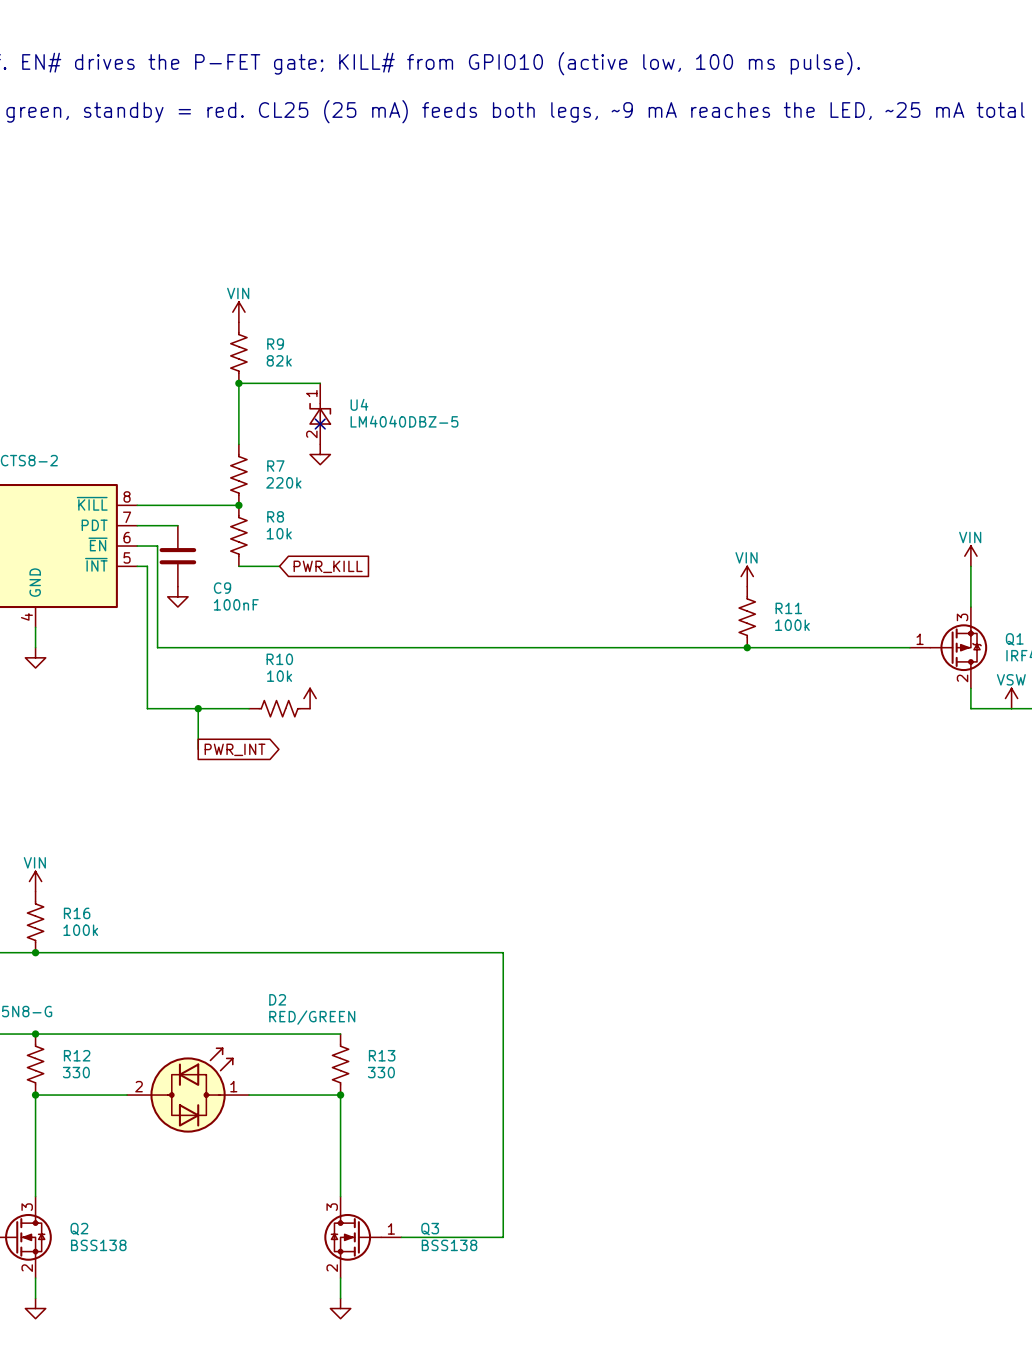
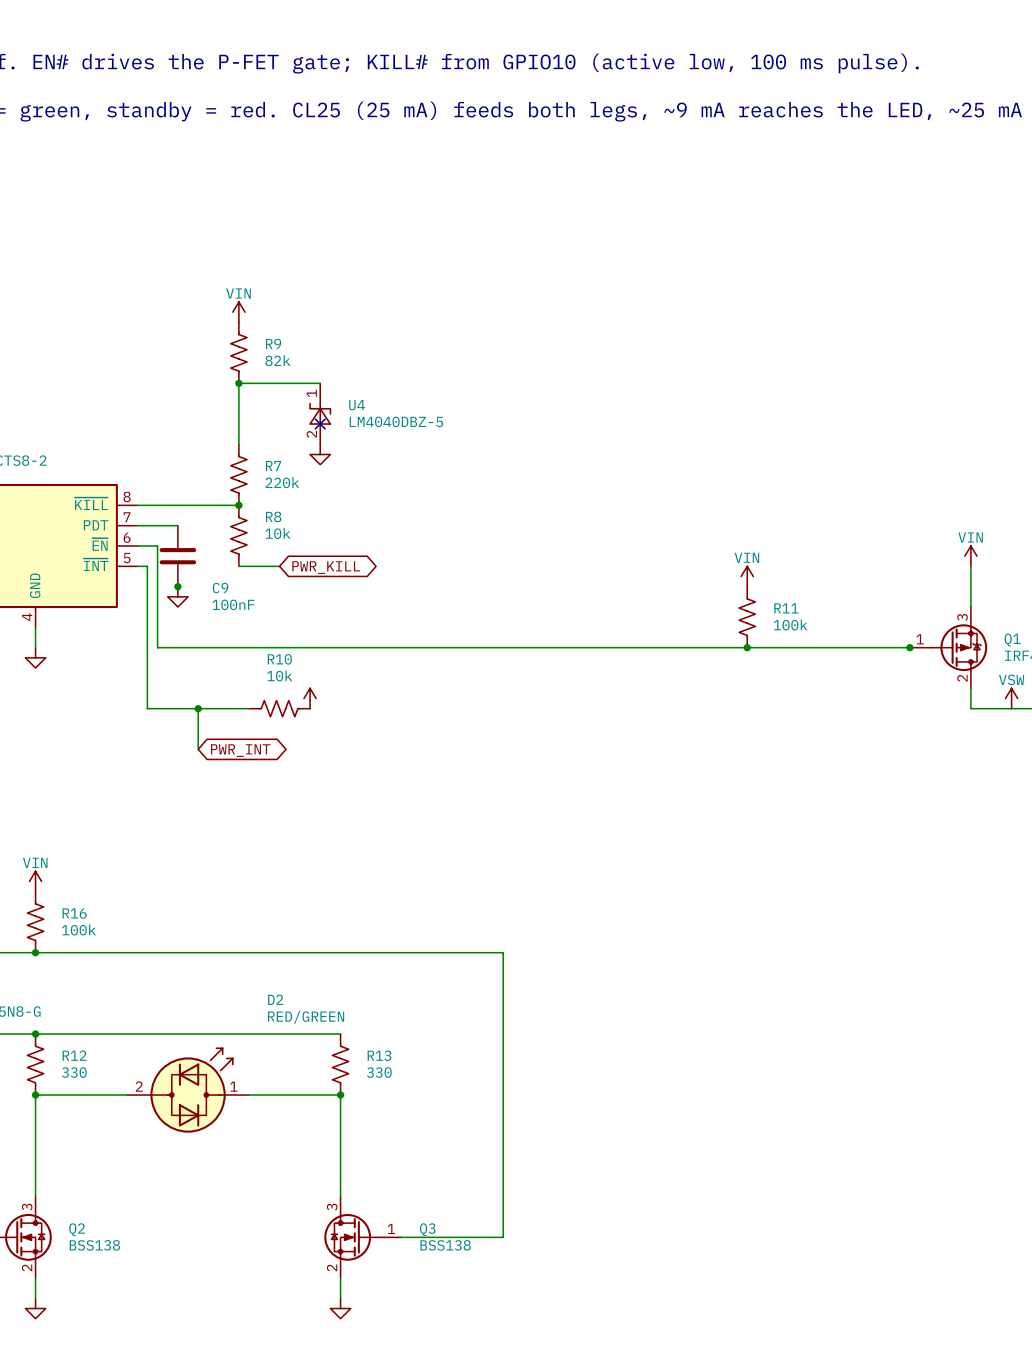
global label shape: input (328, 566) -> bidirectional (326, 567)
junction: none -> (177, 586)
junction: none -> (909, 647)
global label shape: output (235, 749) -> bidirectional (240, 750)

